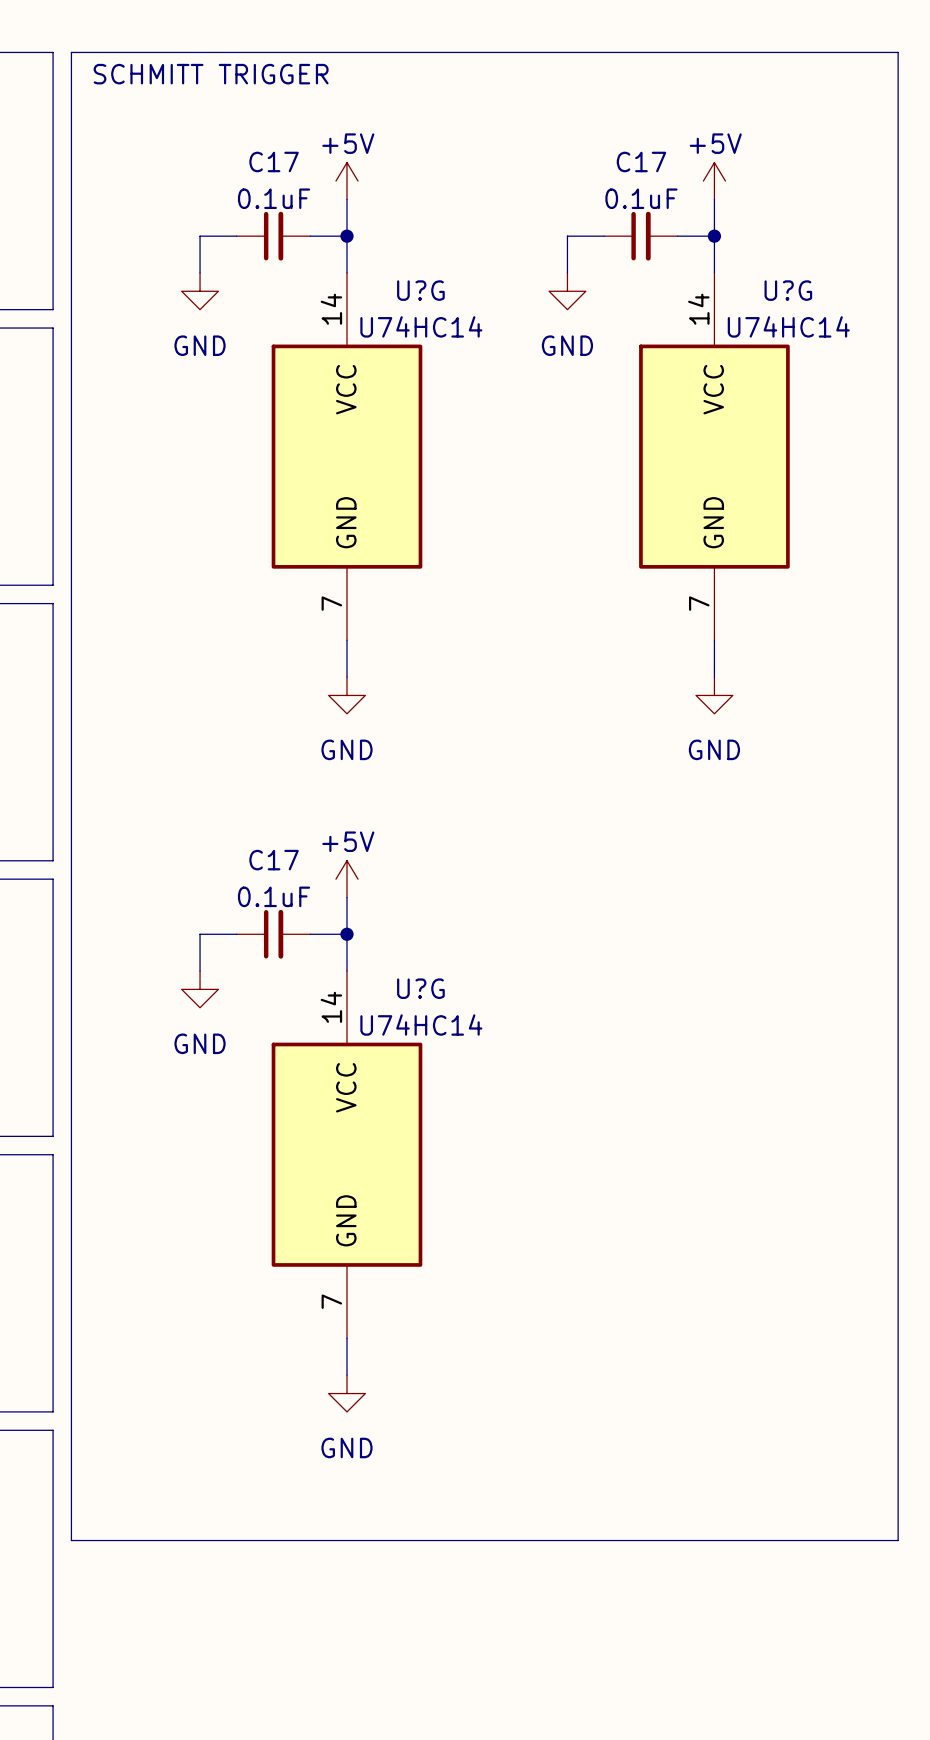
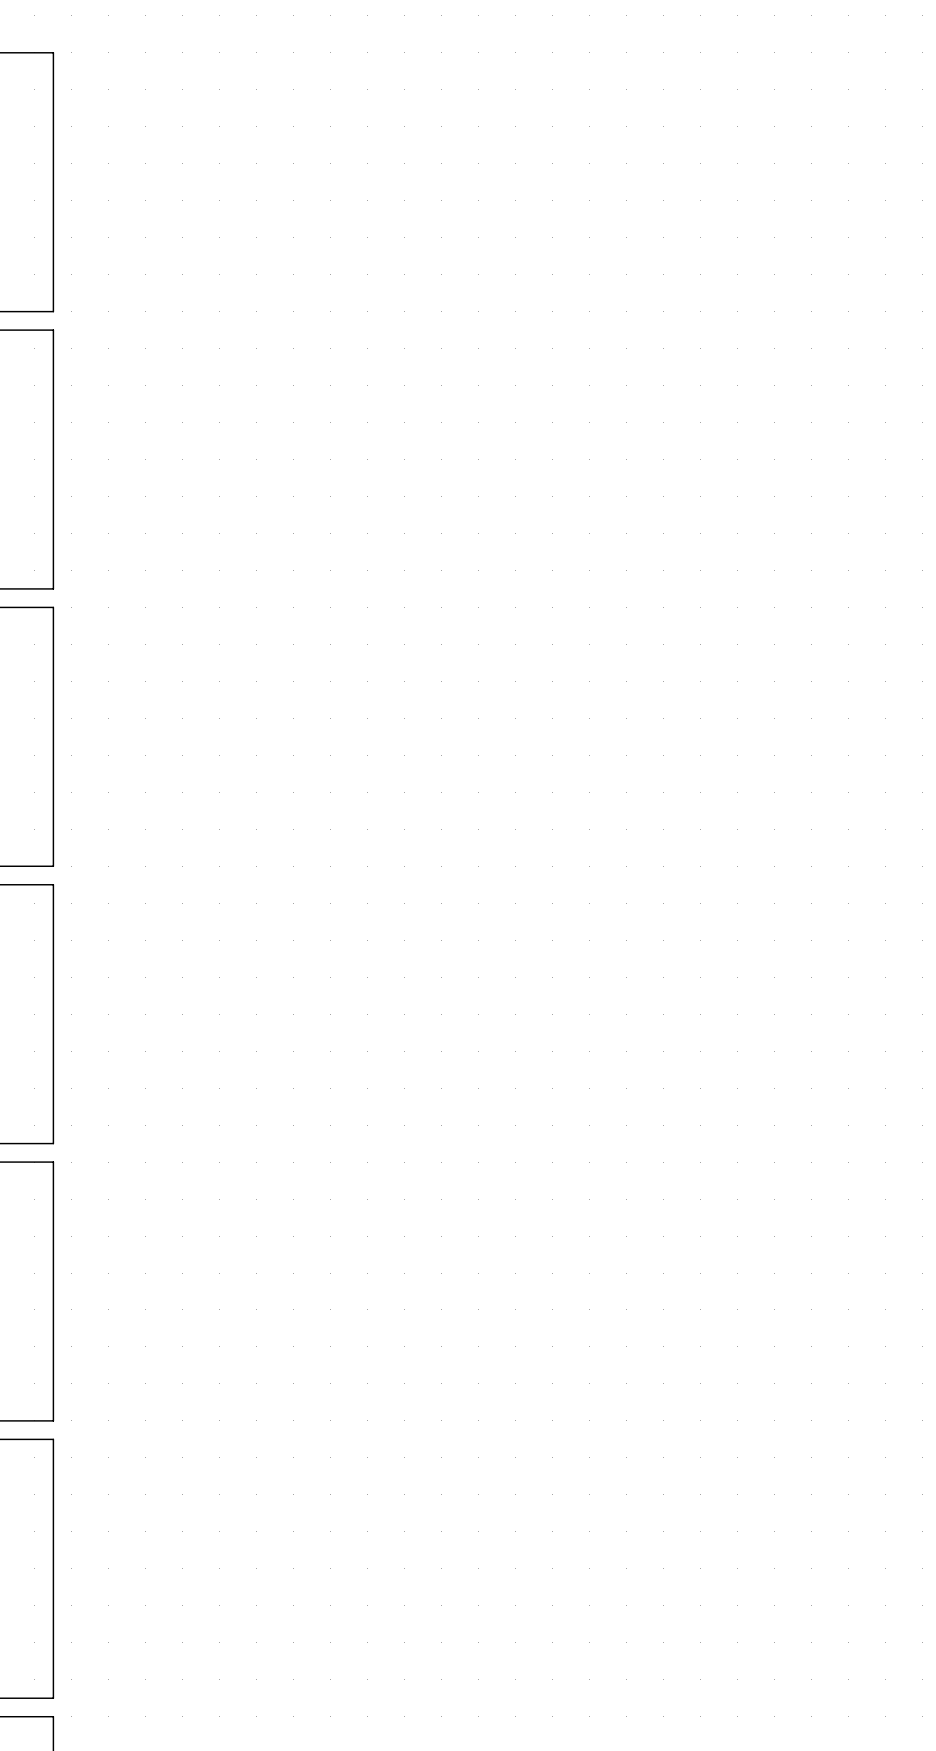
line: (71, 52) (898, 52) (898, 1540) (71, 1540) (71, 52) -> none
text: SCHMITT TRIGGER (211, 74) -> none
power symbol: +5V (346, 181) -> none
power symbol: +5V (714, 181) -> none
wire: (346, 199) (346, 272) -> none
wire: (714, 199) (714, 272) -> none
wire: (236, 236) (200, 236) (200, 272) -> none
C17: 0.1uF (273, 236) -> none
wire: (310, 236) (346, 236) -> none
junction: (346, 236) -> none
wire: (604, 236) (567, 236) (567, 272) -> none
C17: 0.1uF (640, 236) -> none
wire: (677, 236) (714, 236) -> none
junction: (714, 236) -> none
power symbol: GND (200, 291) -> none
power symbol: GND (567, 291) -> none
U?G: U74HC14 (346, 456) -> none
U?G: U74HC14 (714, 456) -> none
wire: (346, 640) (346, 677) -> none
wire: (714, 640) (714, 677) -> none
power symbol: GND (346, 695) -> none
power symbol: GND (714, 695) -> none
power symbol: +5V (346, 879) -> none
wire: (346, 897) (346, 971) -> none
wire: (236, 934) (200, 934) (200, 971) -> none
C17: 0.1uF (273, 934) -> none
wire: (310, 934) (346, 934) -> none
junction: (346, 934) -> none
power symbol: GND (200, 989) -> none
U?G: U74HC14 (346, 1154) -> none
wire: (346, 1338) (346, 1375) -> none
power symbol: GND (346, 1393) -> none

